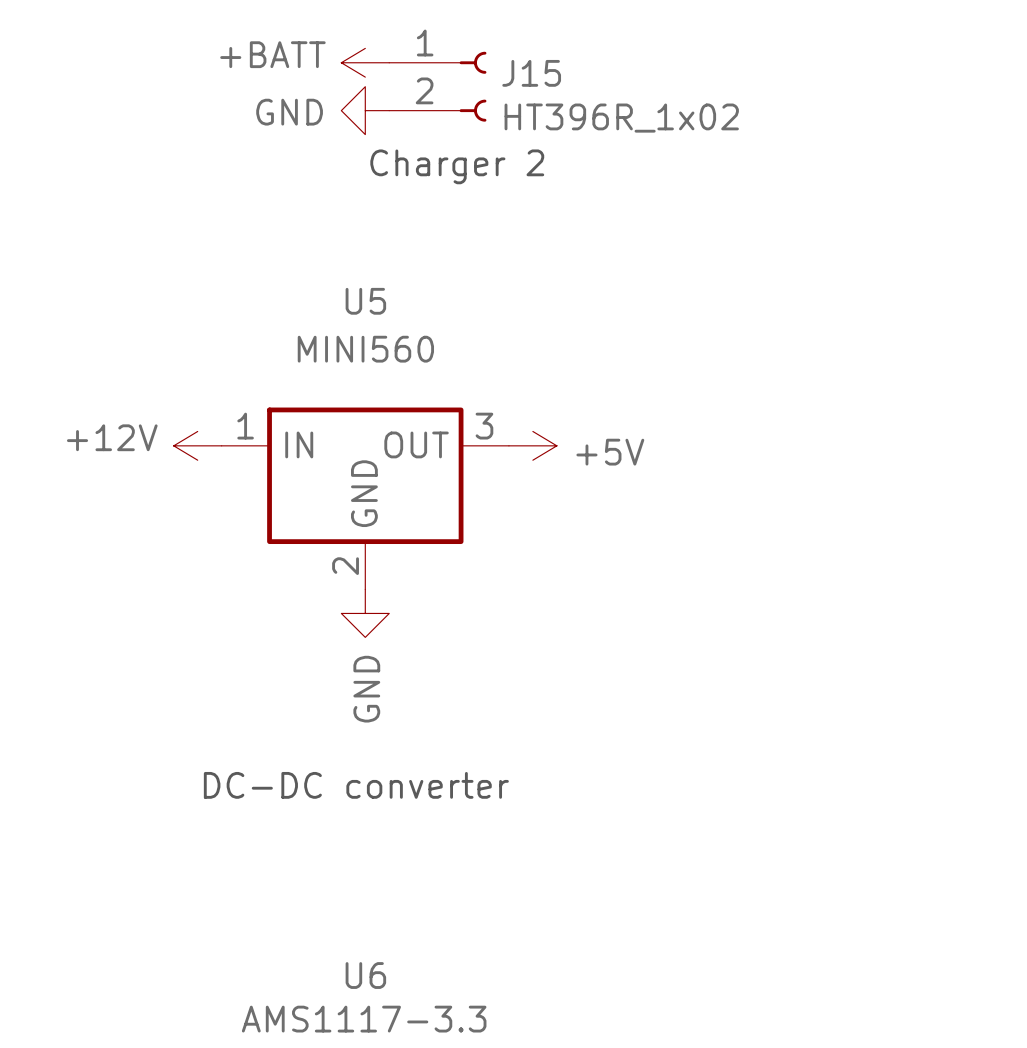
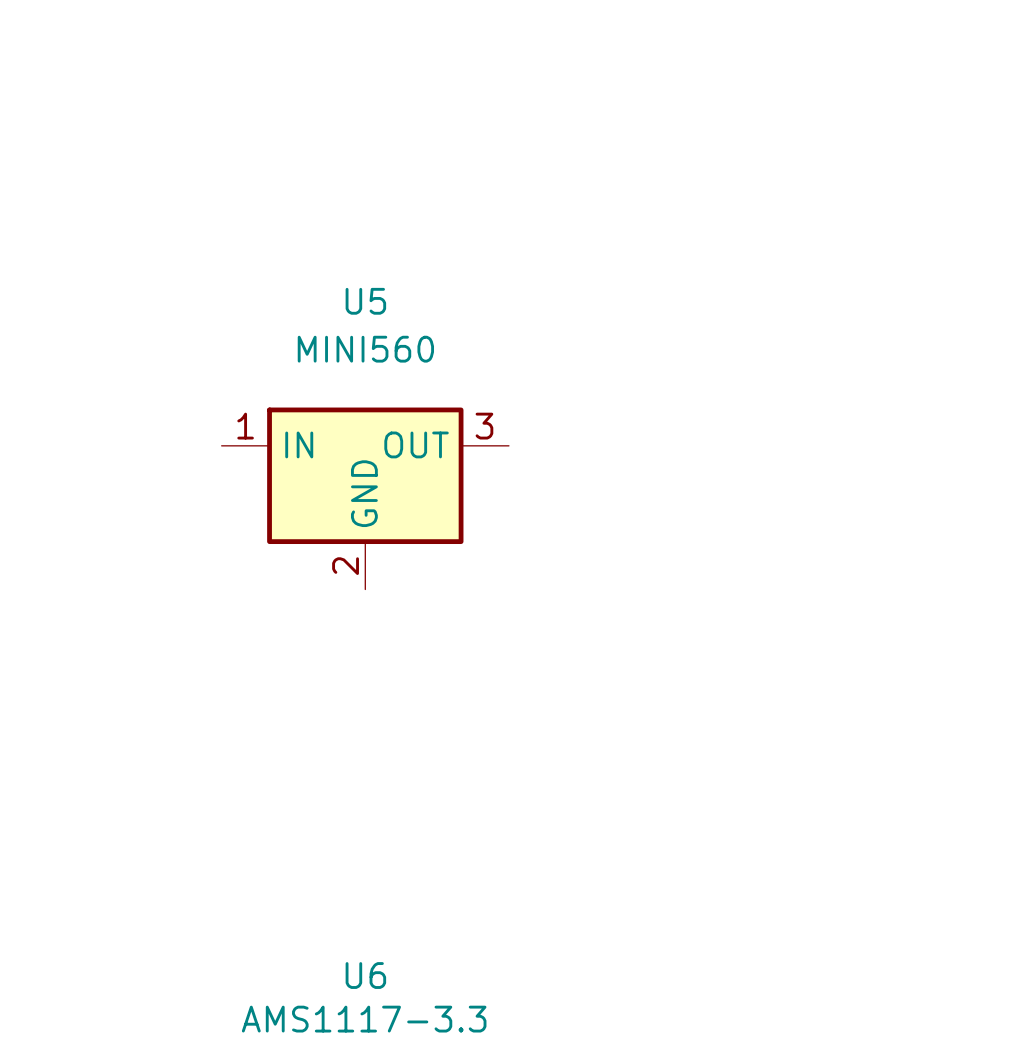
power symbol: +BATT (365, 62) -> none
J15: HT396R_1x02 (437, 86) -> none
power symbol: GND (365, 110) -> none
text: Charger 2 (457, 166) -> none
power symbol: +12V (197, 445) -> none
power symbol: +5V (532, 445) -> none
power symbol: GND (365, 613) -> none
text: DC-DC converter (356, 785) -> none

